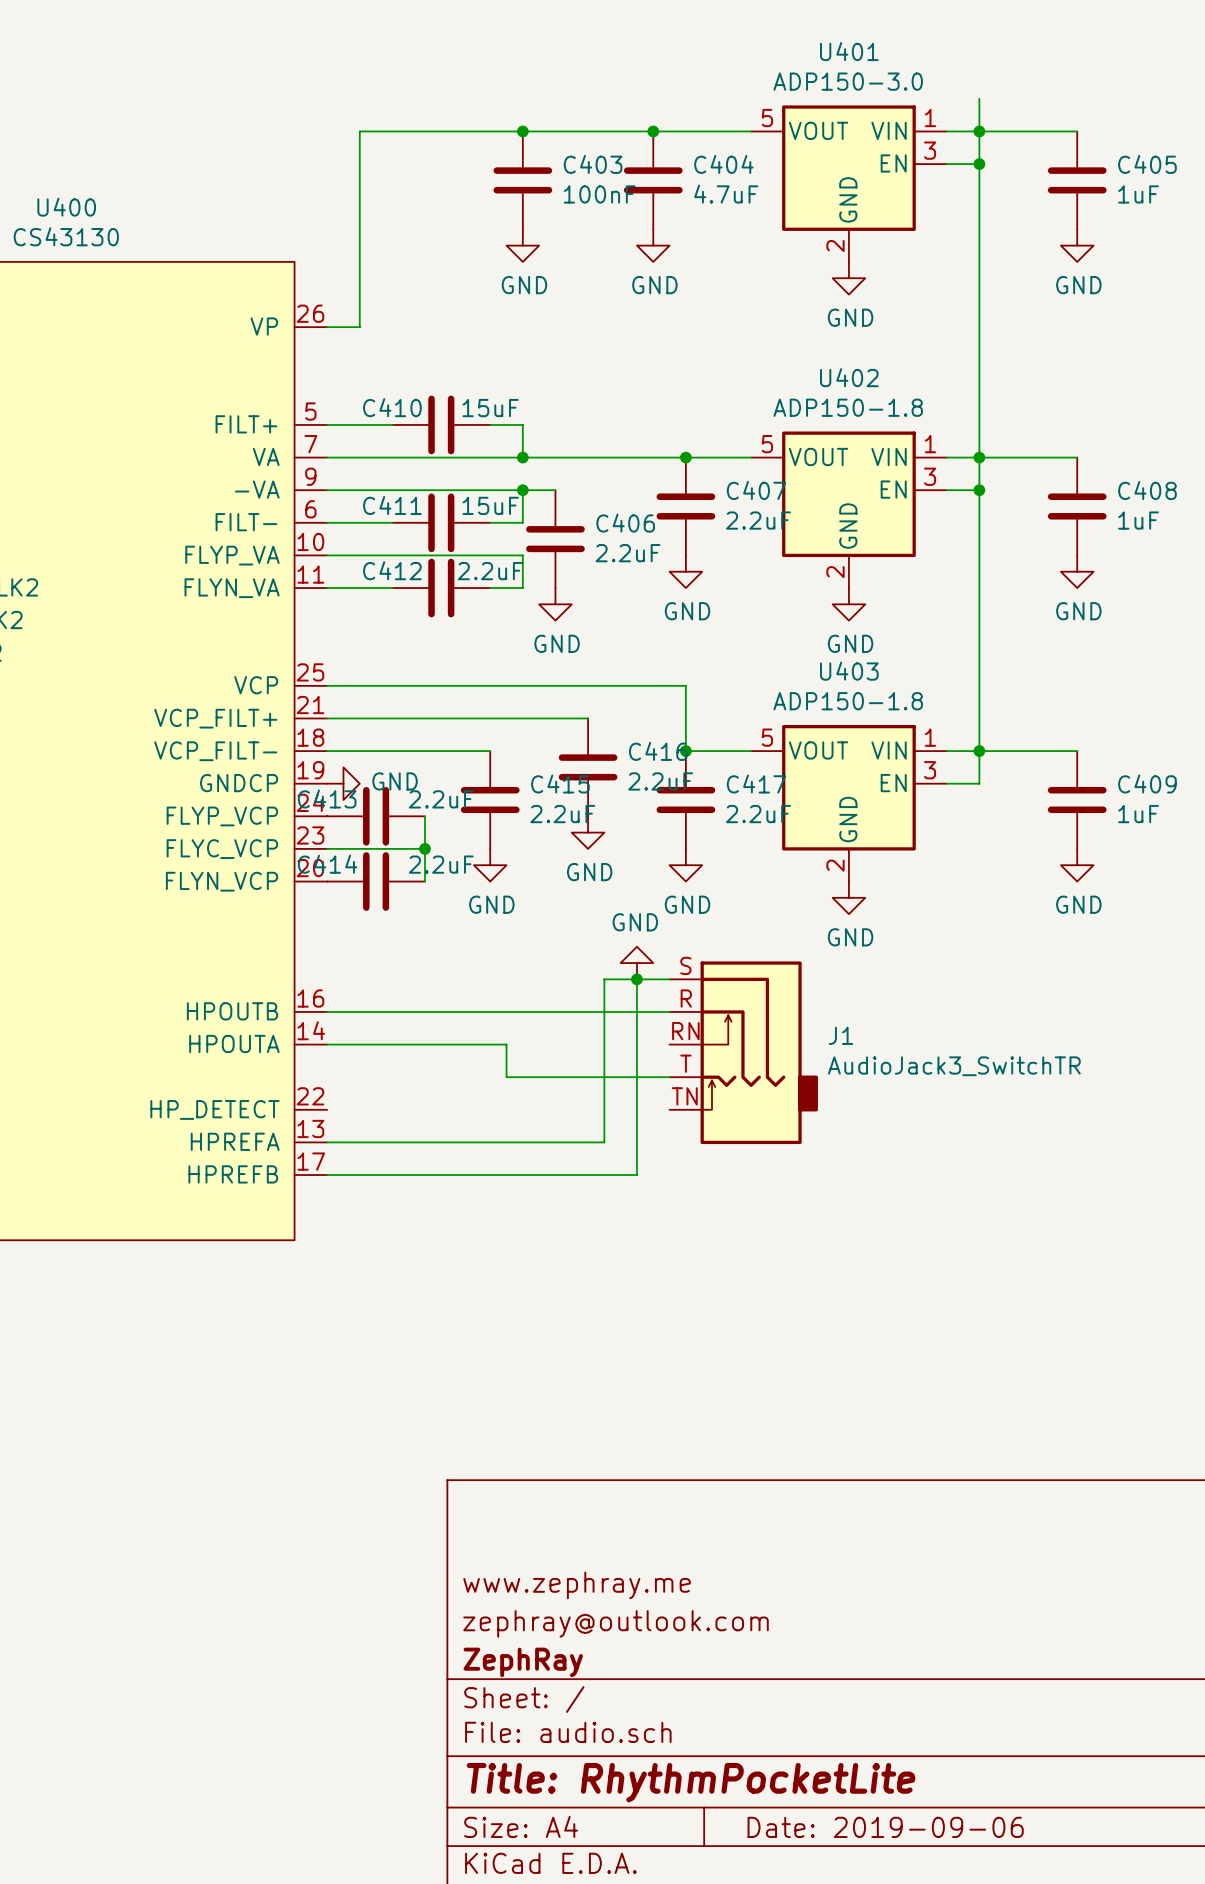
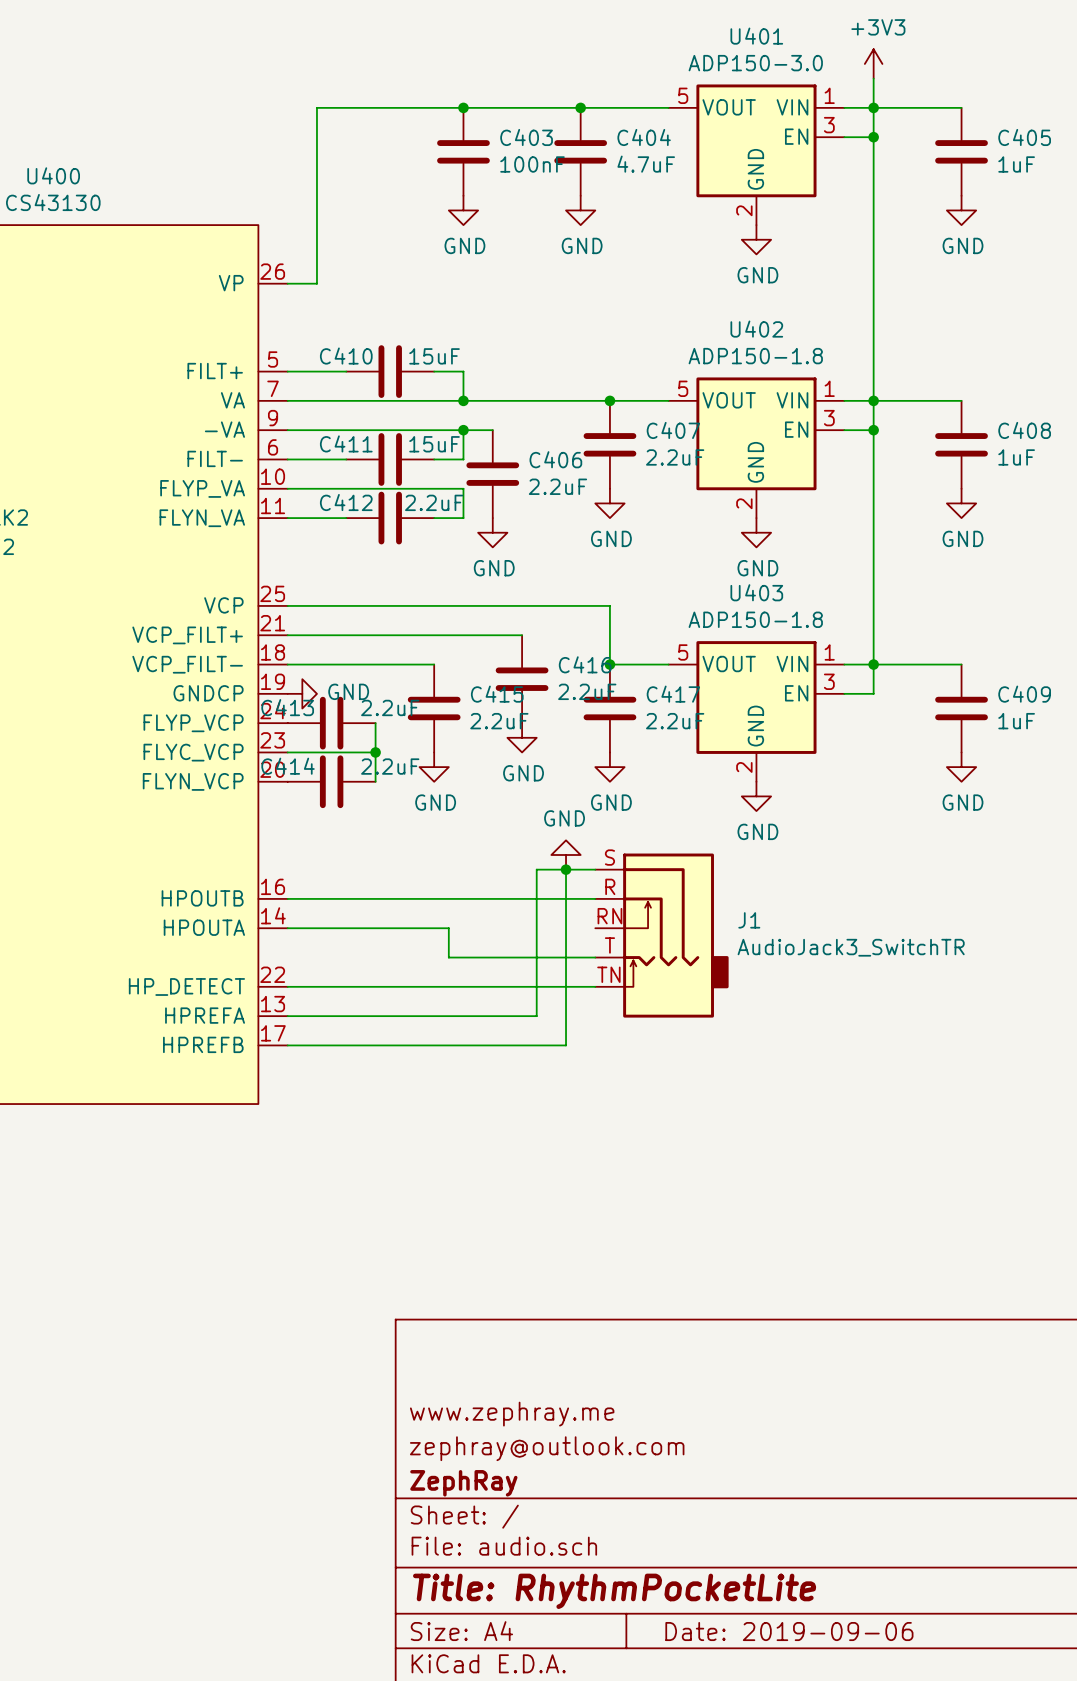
power symbol: none -> +3V3 (873, 63)
wire: none -> (287, 986) (595, 986)

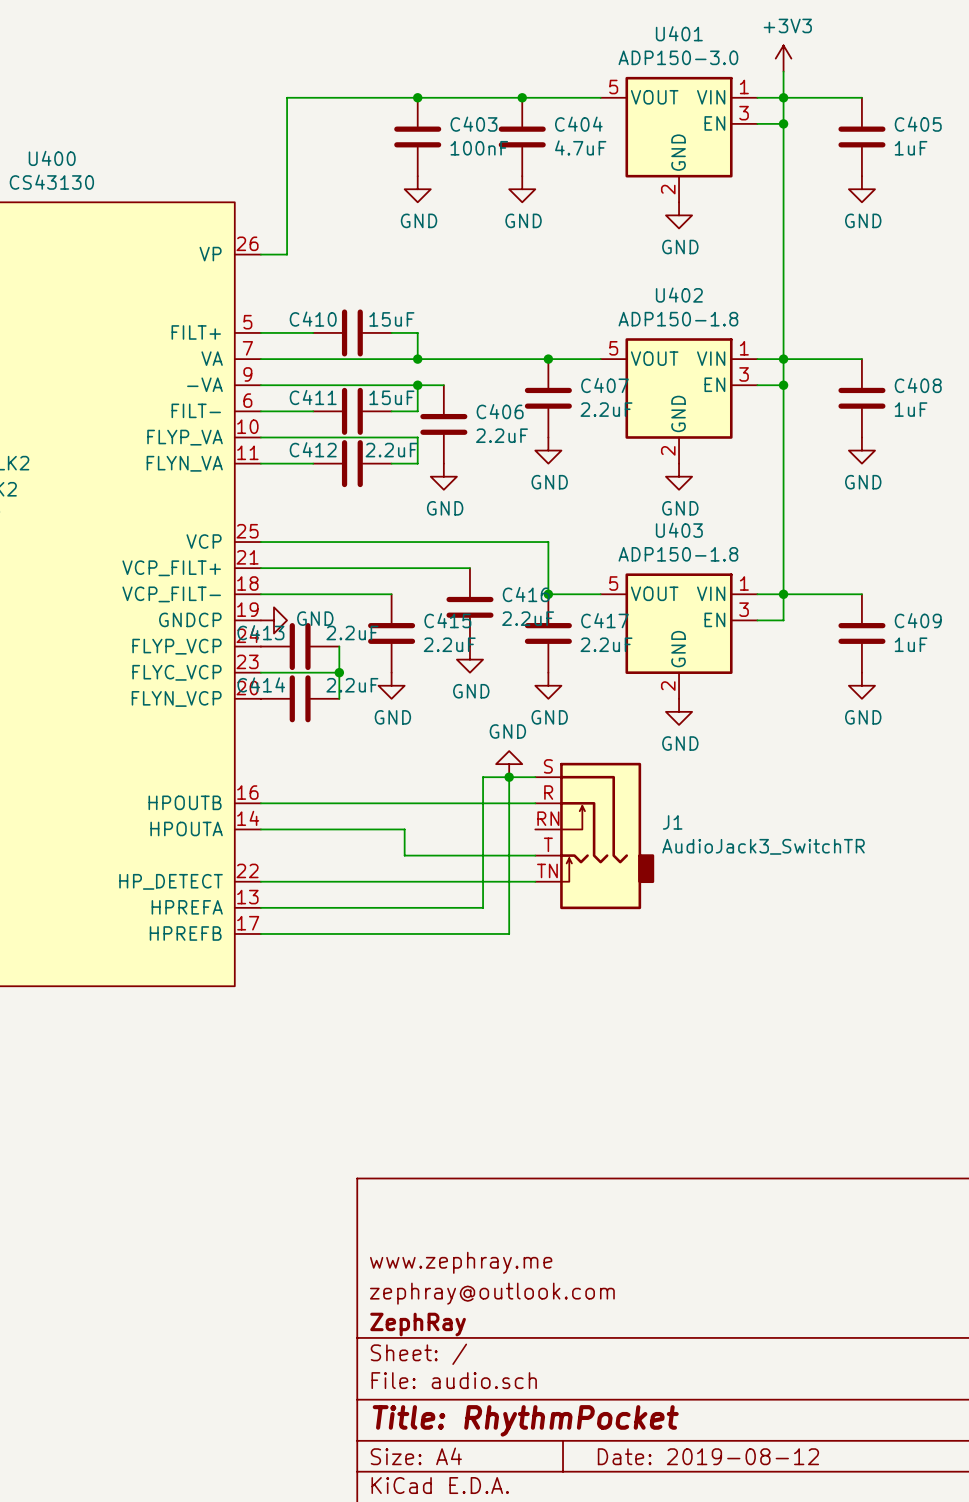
title block: Title: RhythmPocketLite (614, 1591) -> Title: RhythmPocket (525, 1420)
title block: Date: 2019-09-06 (789, 1631) -> Date: 2019-08-12 (708, 1456)

